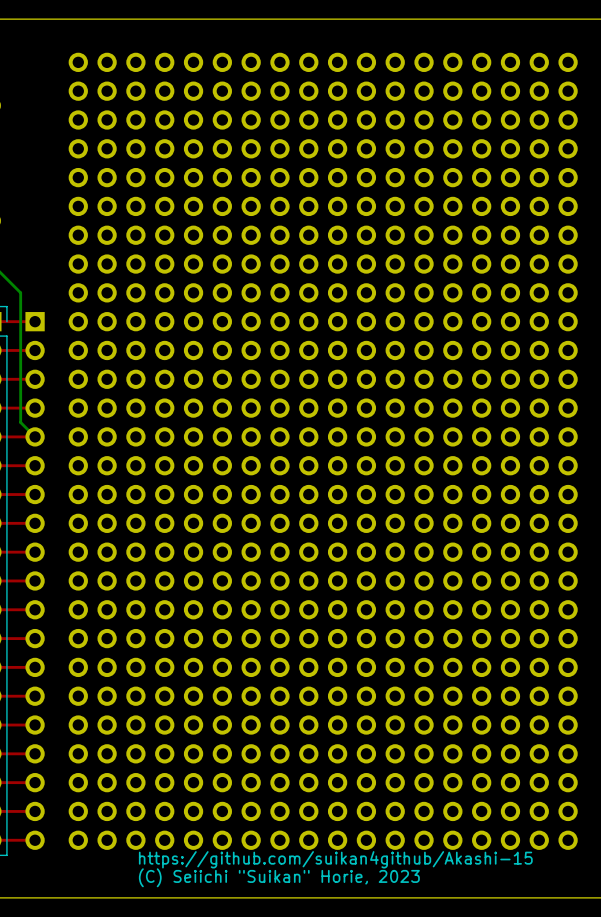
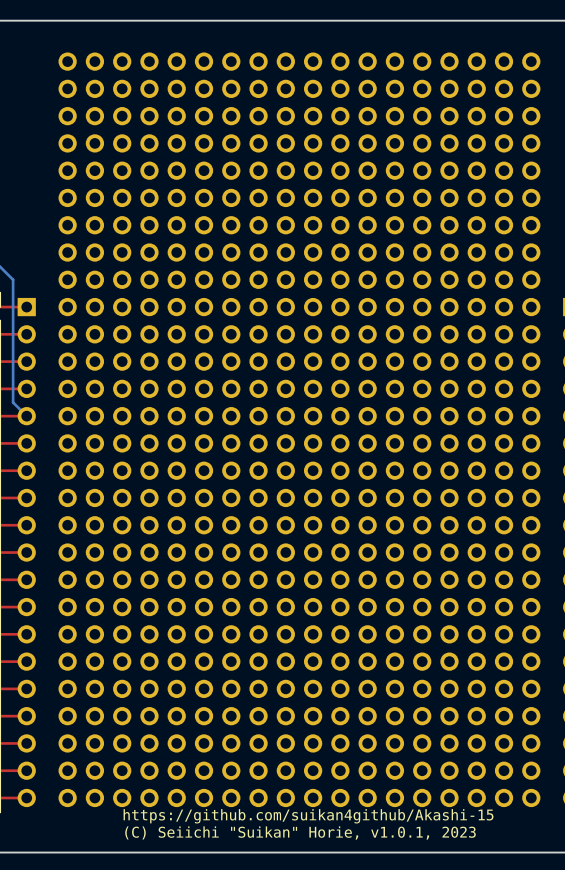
text: (C) Seiichi "Suikan" Horie, 2023 (279, 877) -> (C) Seiichi "Suikan" Horie, v1.0.1, 2023 (300, 833)

